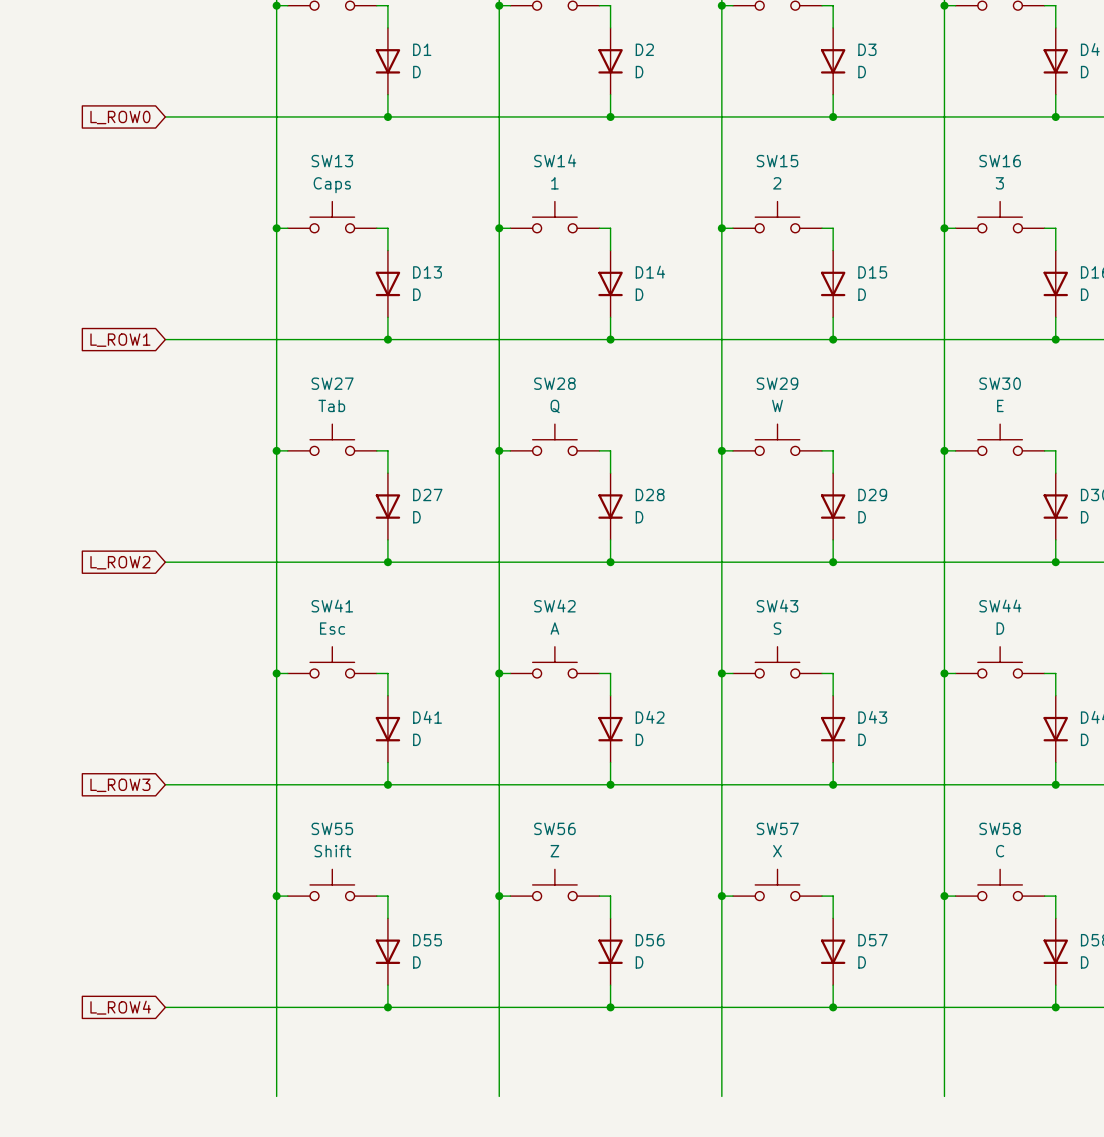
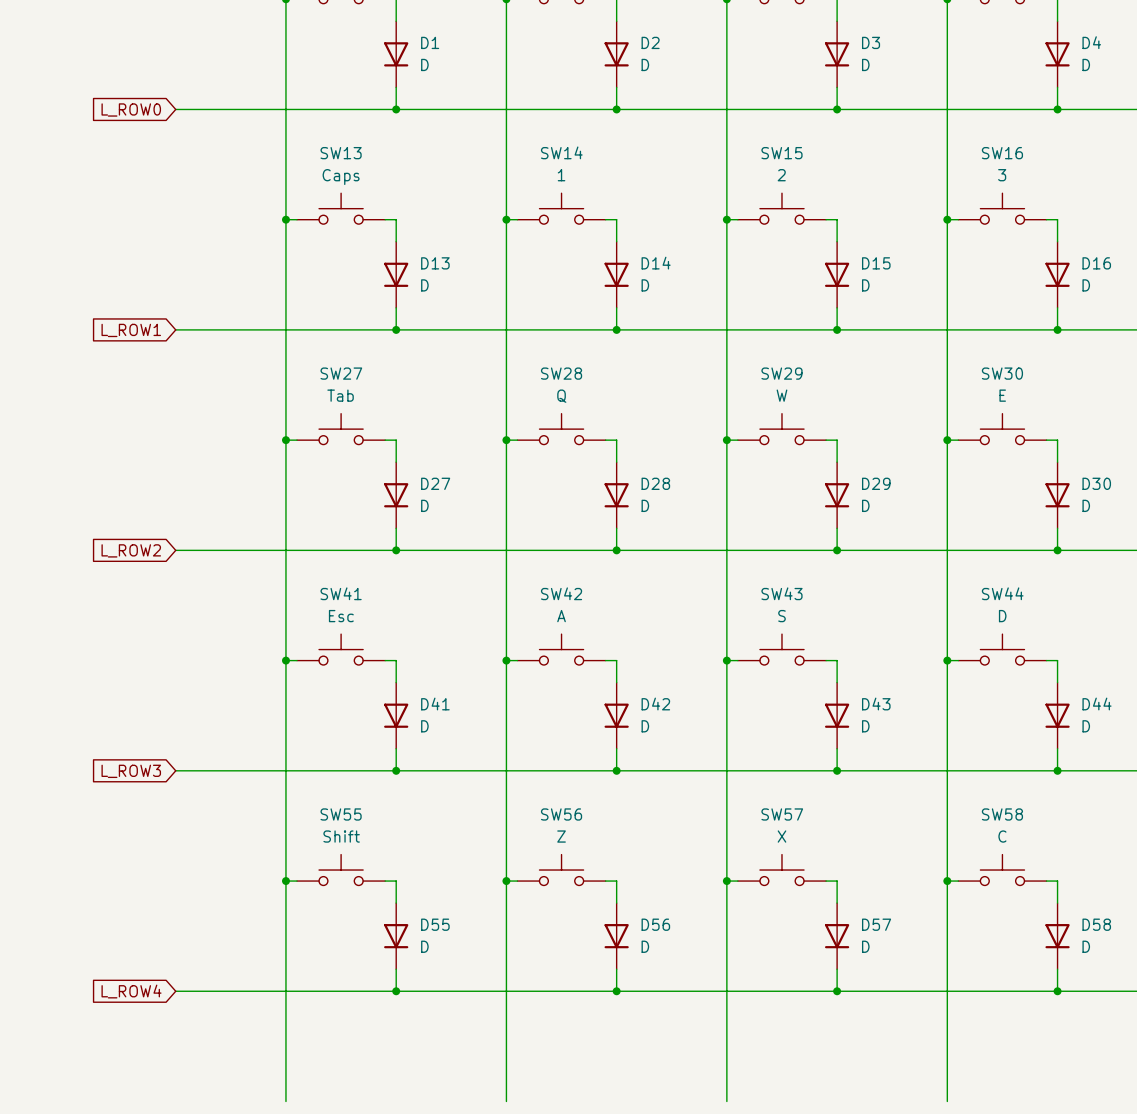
wire: none -> (285, 1079) (285, 1101)
wire: none -> (506, 1079) (506, 1101)
wire: none -> (726, 1079) (726, 1101)
wire: none -> (947, 1079) (947, 1101)

